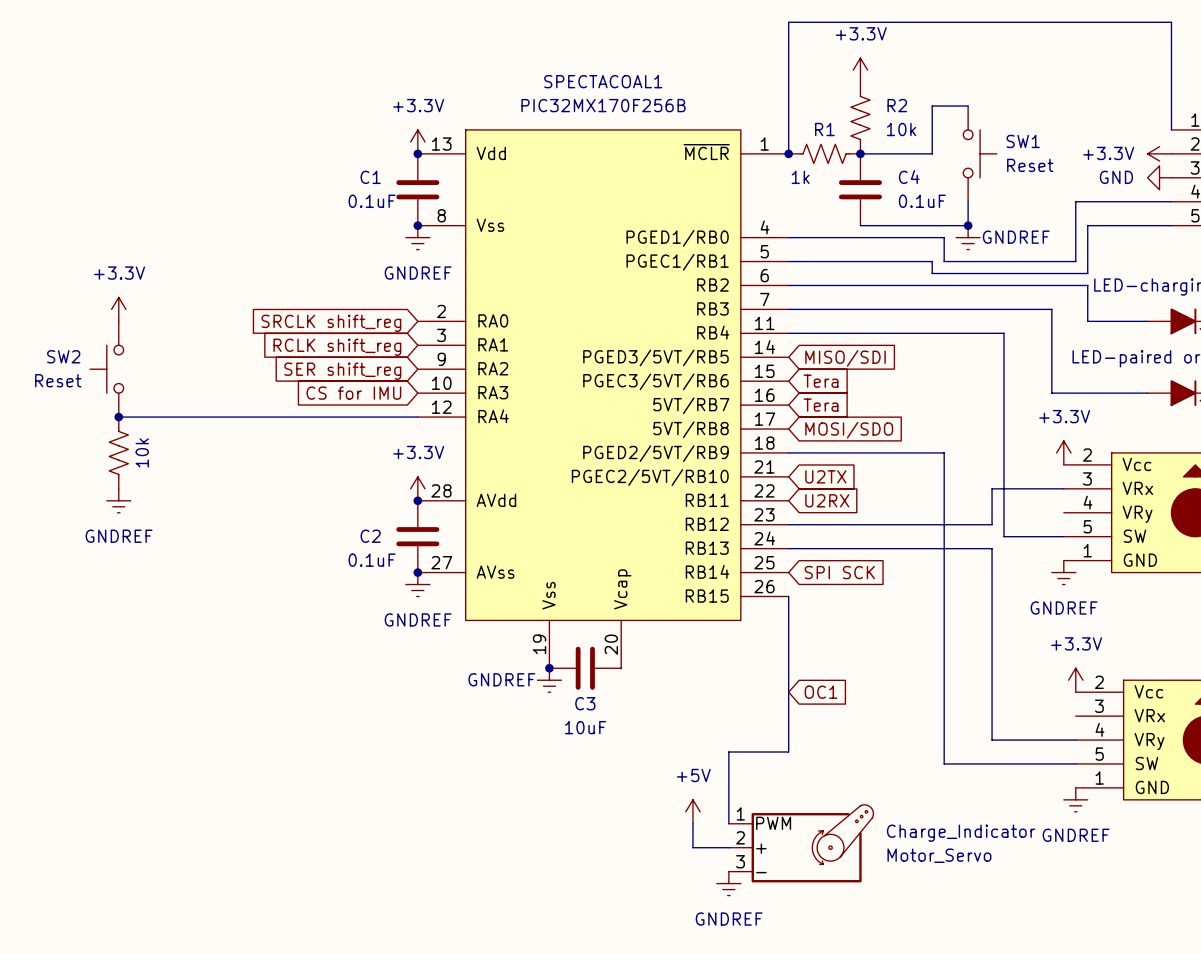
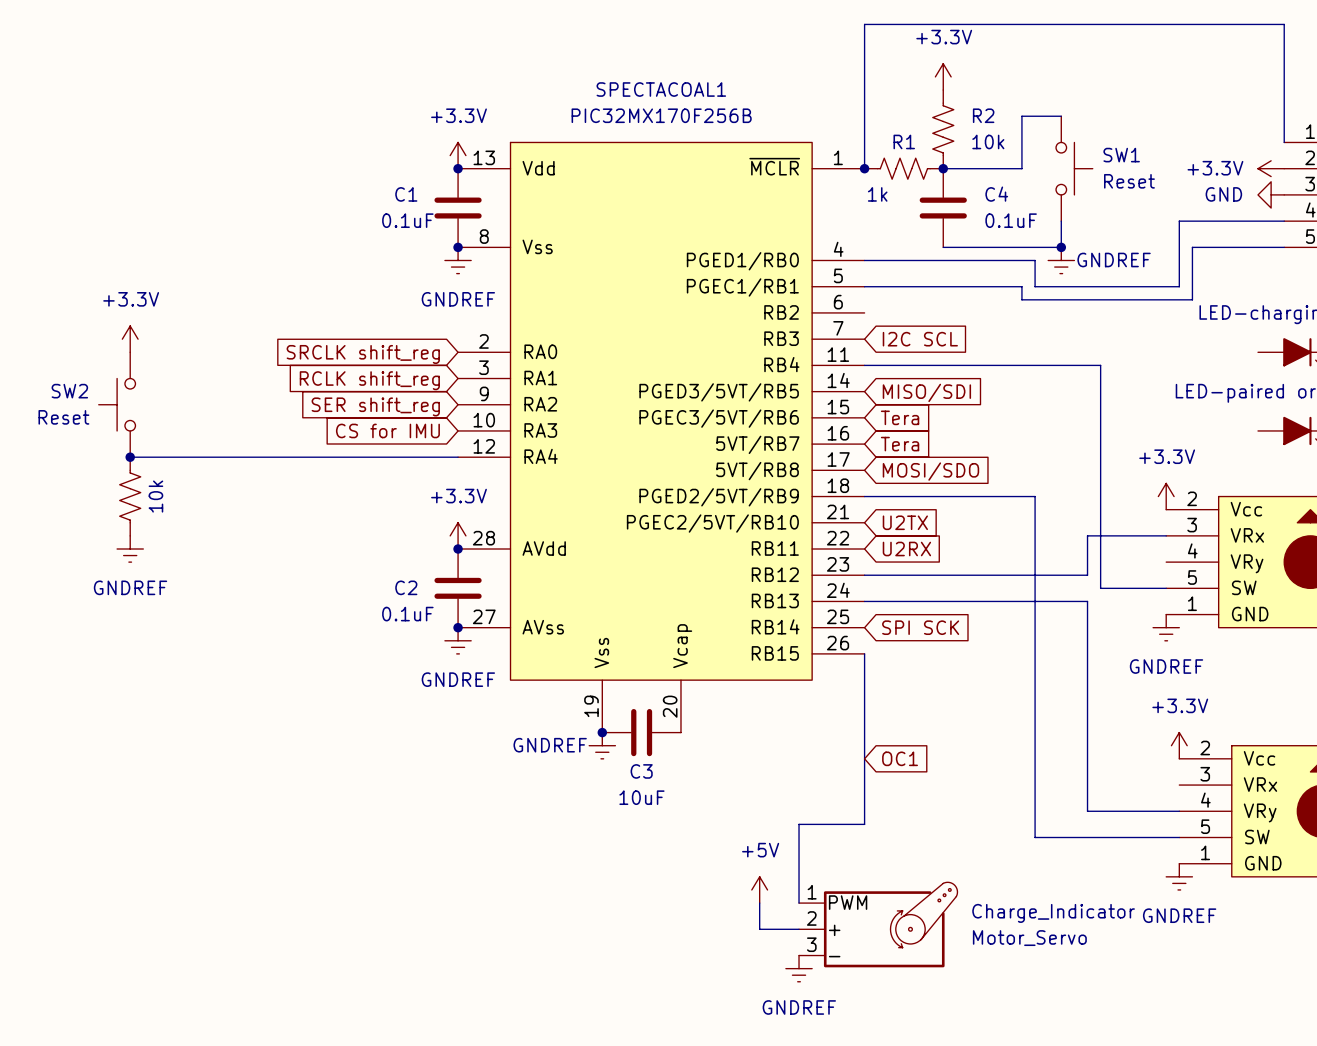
wire: (788, 285) (1087, 285) (1087, 321) (1147, 321) -> none
wire: (788, 309) (1051, 309) (1051, 393) (1147, 393) -> none
global label: none -> I2C SCL (920, 339)

